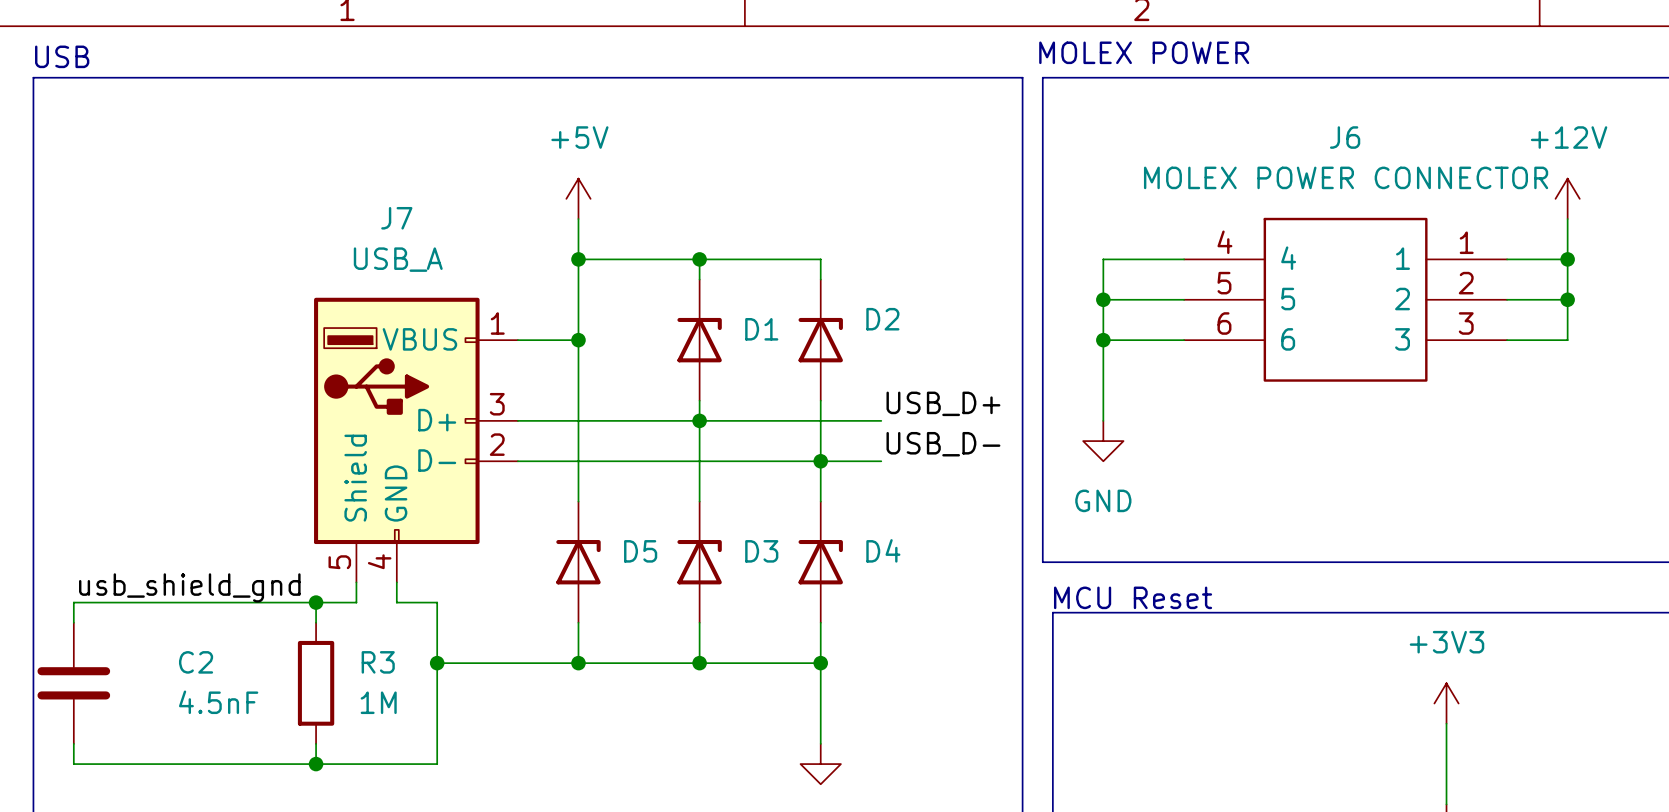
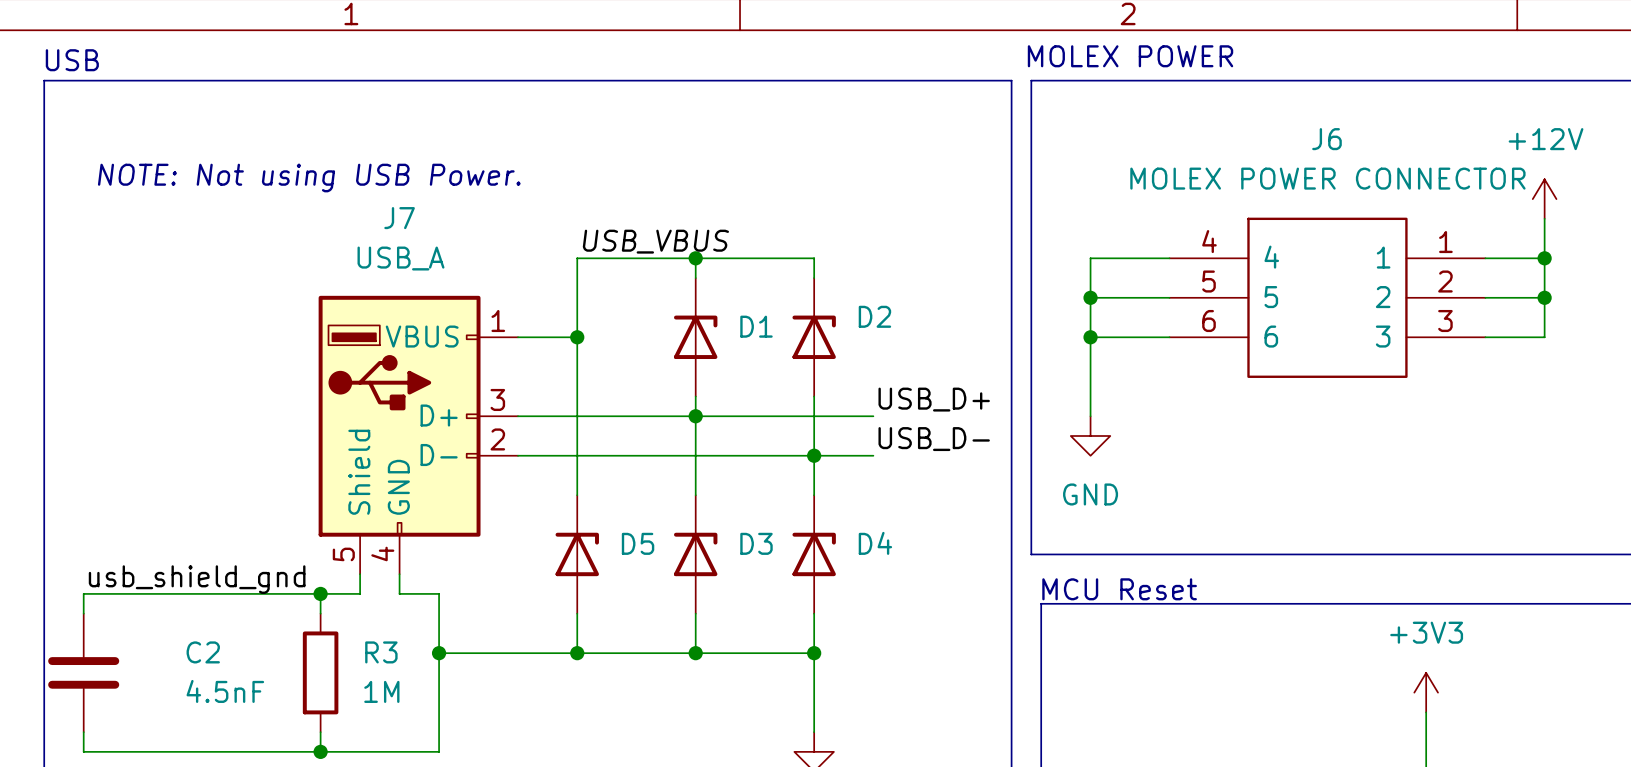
text: none -> NOTE: Not using USB Power. (309, 178)
power symbol: +5V (578, 198) -> none
wire: (578, 219) (578, 259) -> none
label: none -> USB_VBUS (655, 241)
junction: (578, 259) -> none

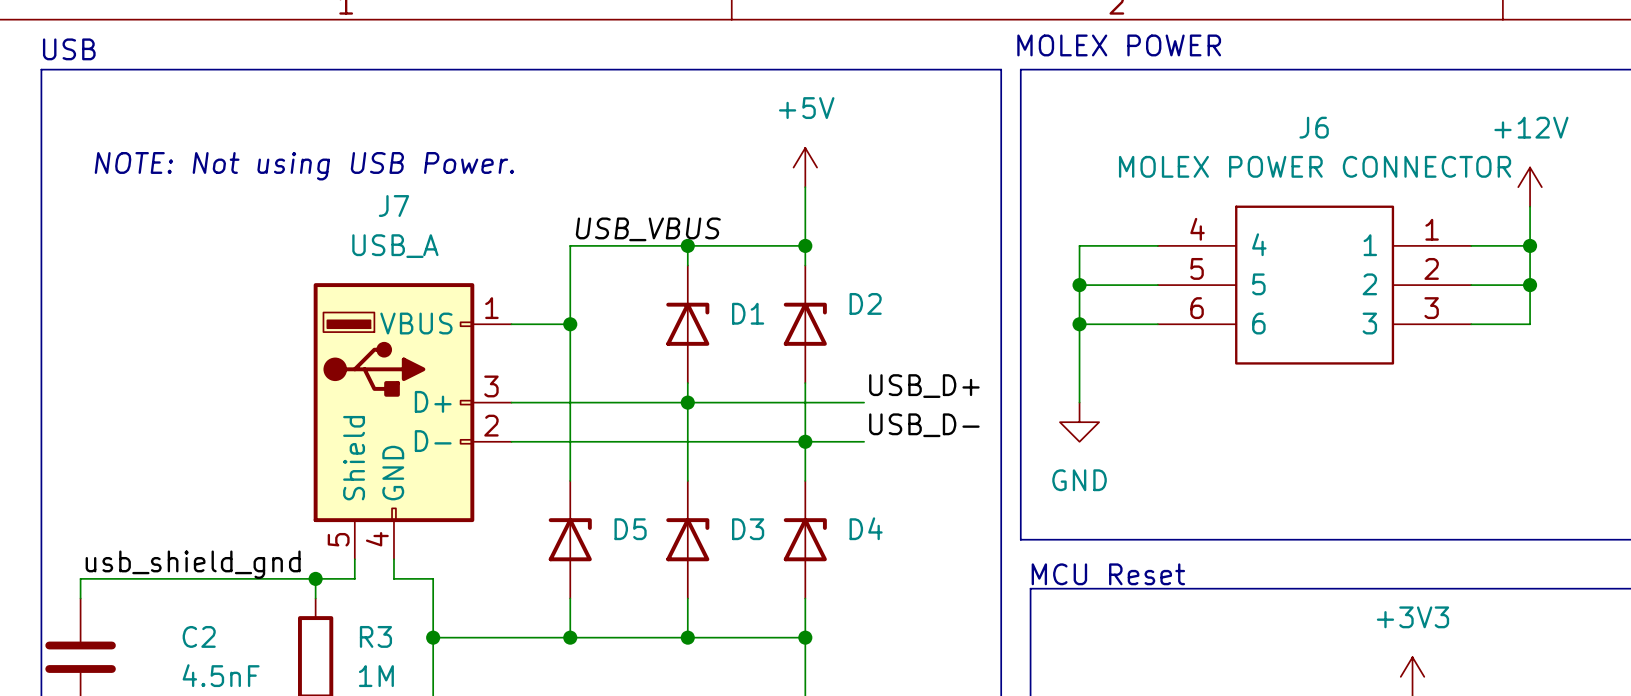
power symbol: none -> +5V (805, 167)
wire: none -> (805, 187) (805, 245)
junction: none -> (805, 245)

